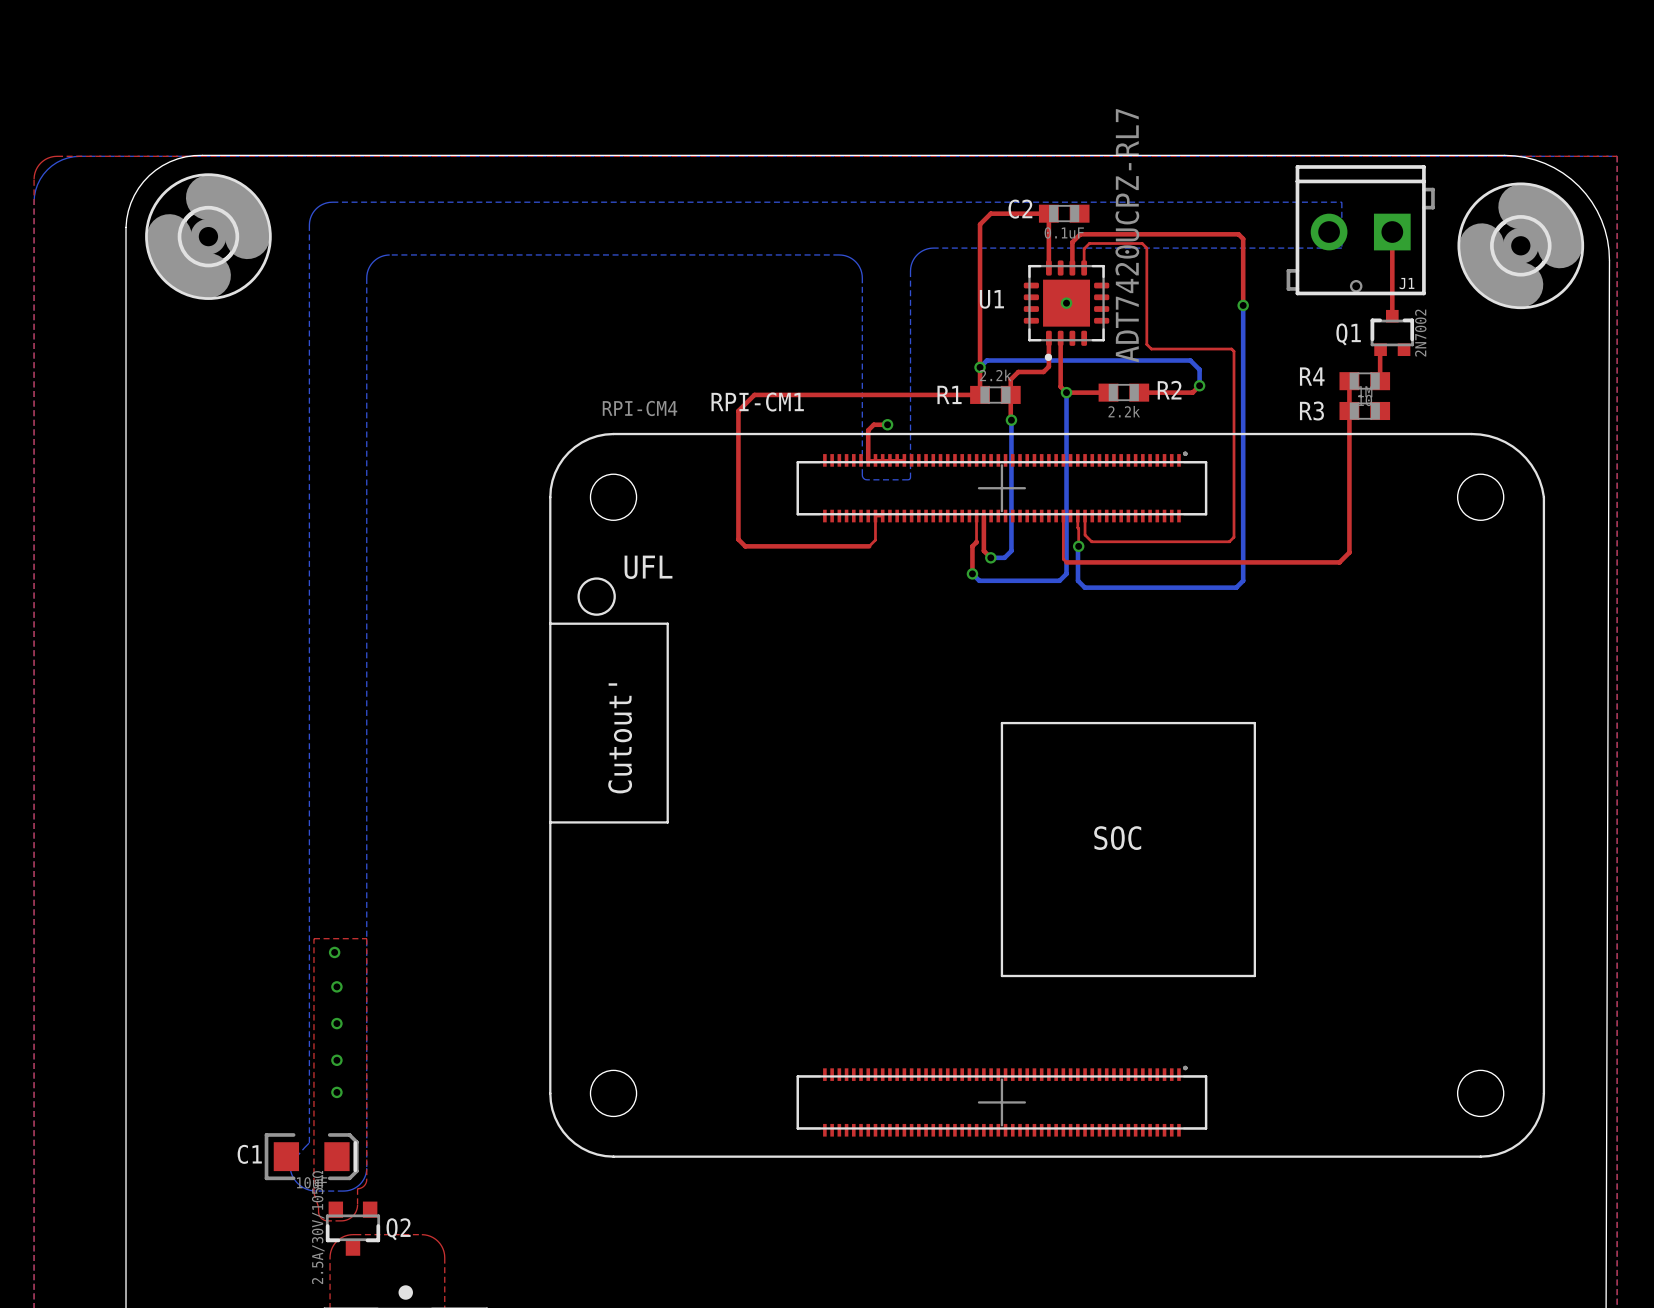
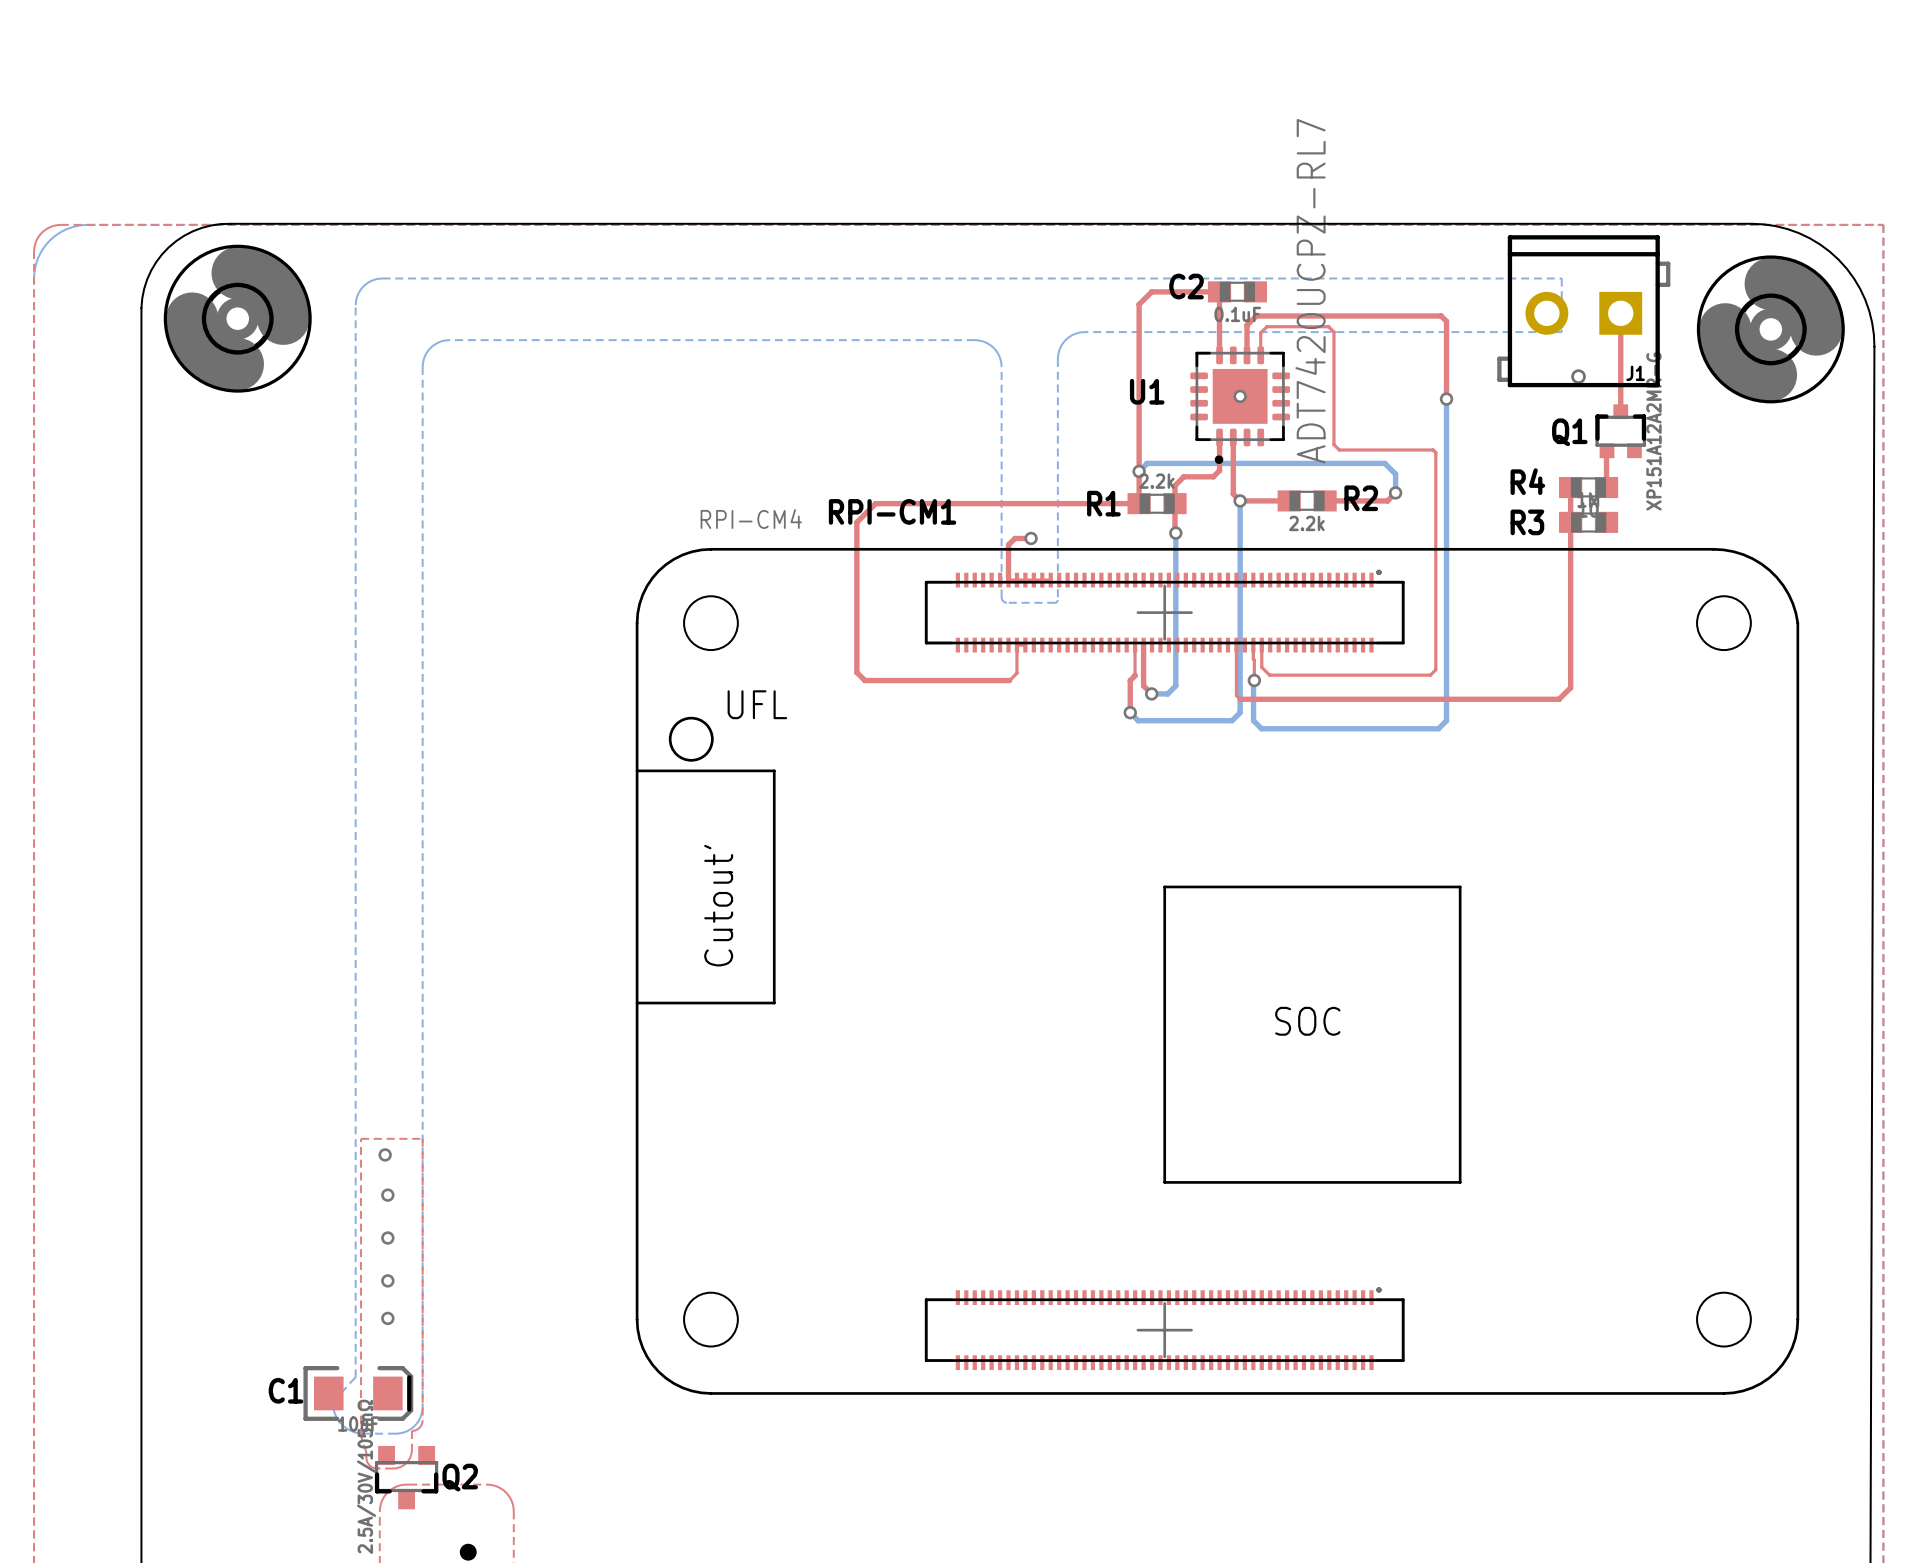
Q1 value: 2N7002 (1420, 333) -> XP151A12A2MR-G (1653, 431)

